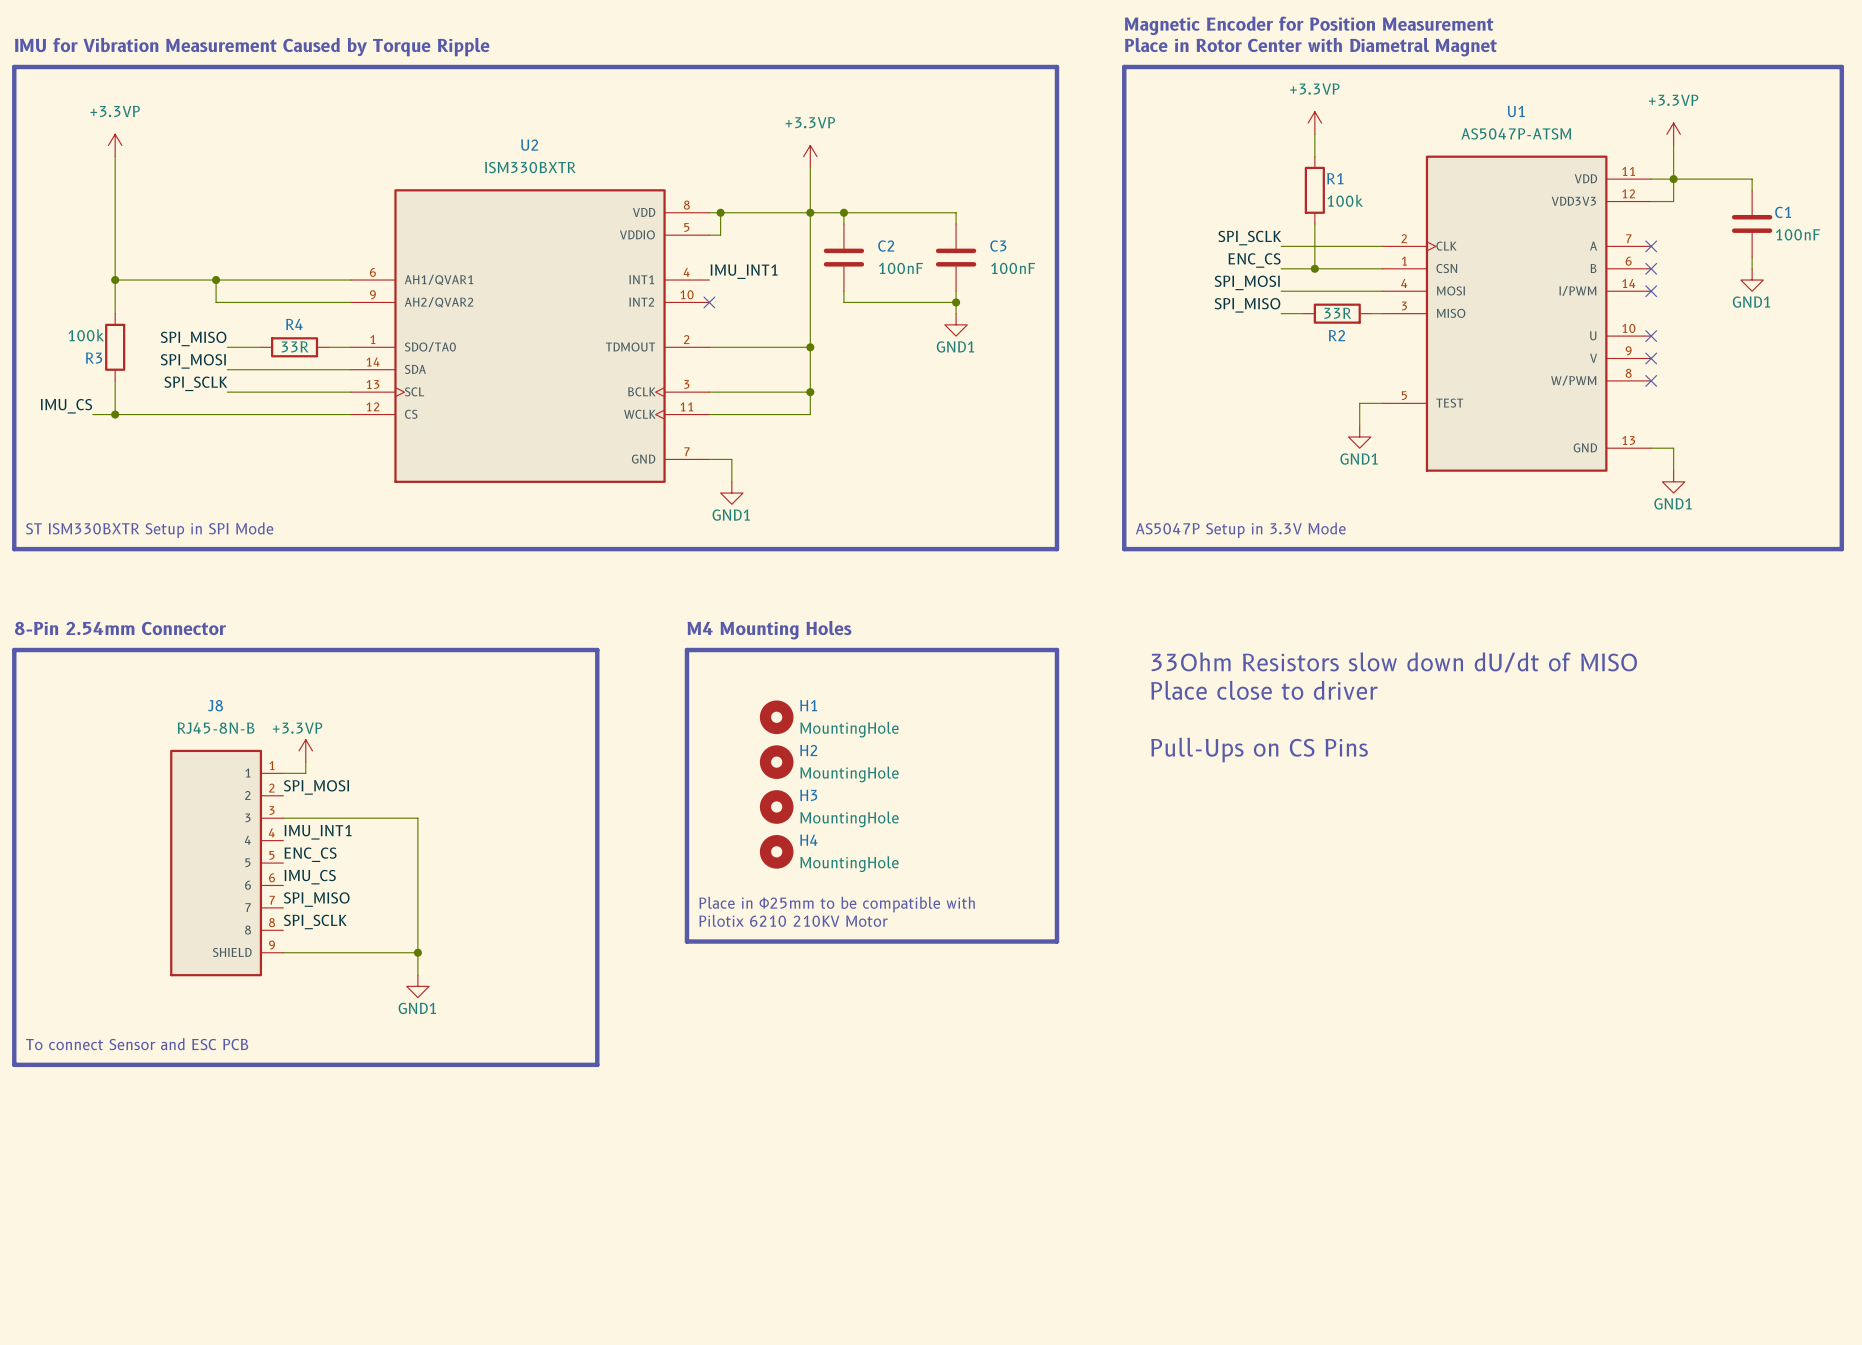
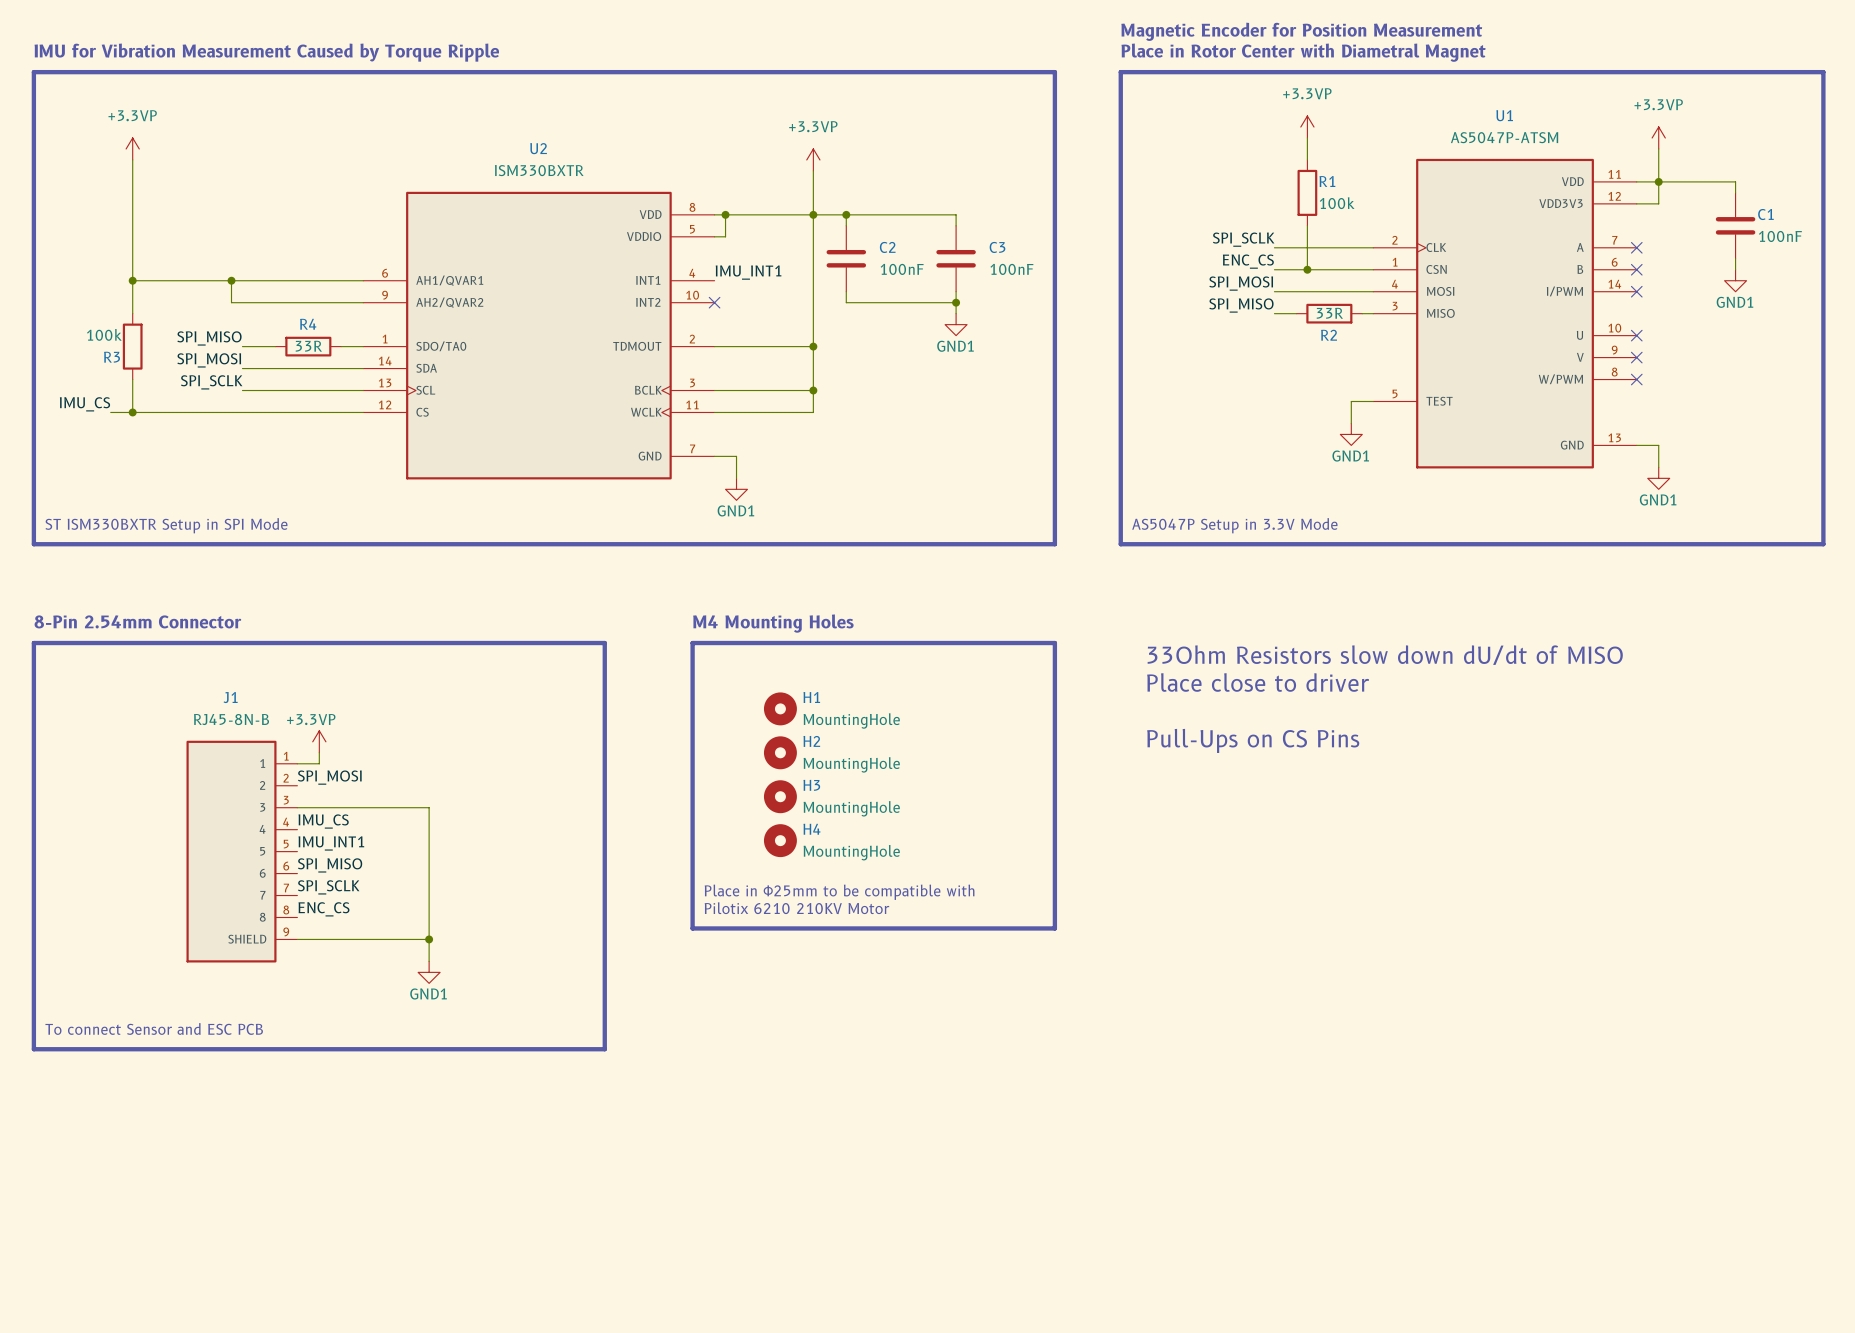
J8 name: J8 (215, 705) -> J1 (230, 697)
label: IMU_INT1 (318, 832) -> IMU_CS (323, 821)
label: ENC_CS (310, 854) -> IMU_INT1 (331, 843)
label: IMU_CS (310, 877) -> SPI_MISO (330, 865)
label: SPI_MISO (316, 899) -> SPI_SCLK (328, 887)
label: SPI_SCLK (315, 921) -> ENC_CS (323, 909)

